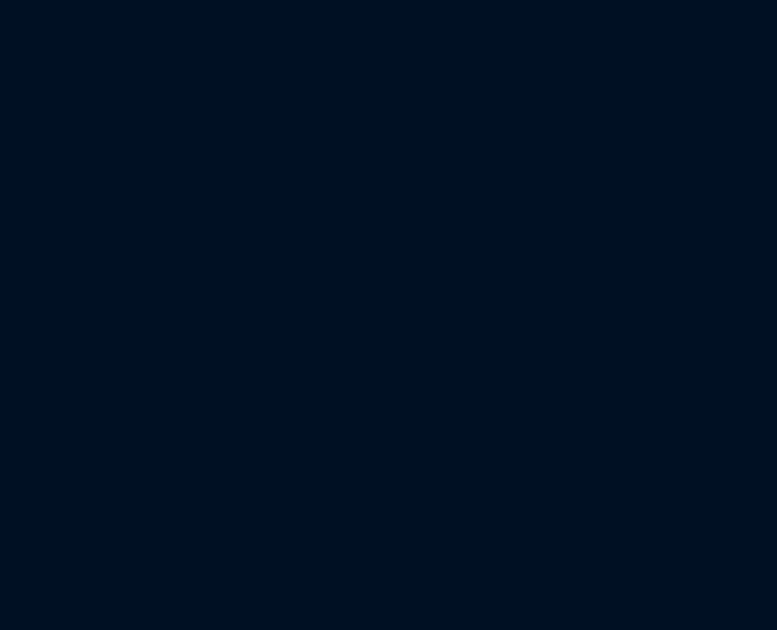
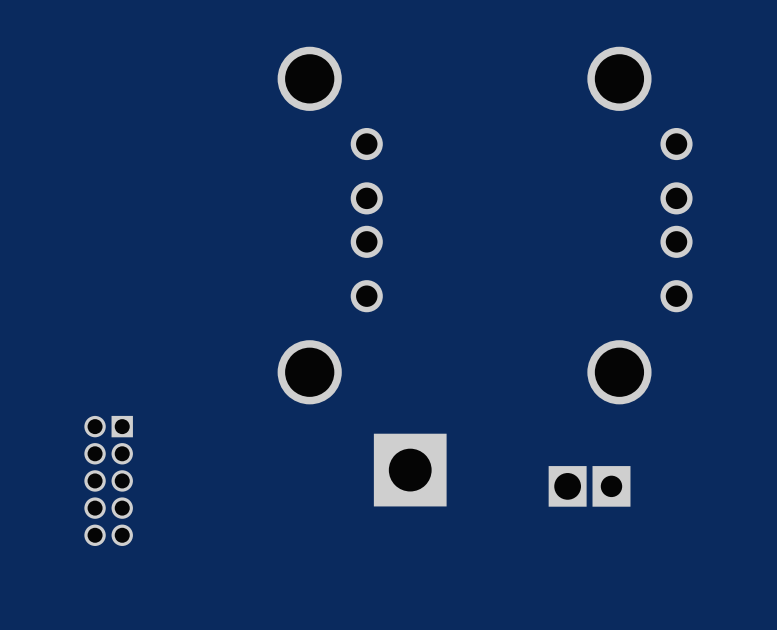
part: none -> (330, 225)
part: none -> (639, 225)
part: none -> (410, 470)
part: none -> (108, 480)
part: none -> (589, 486)

